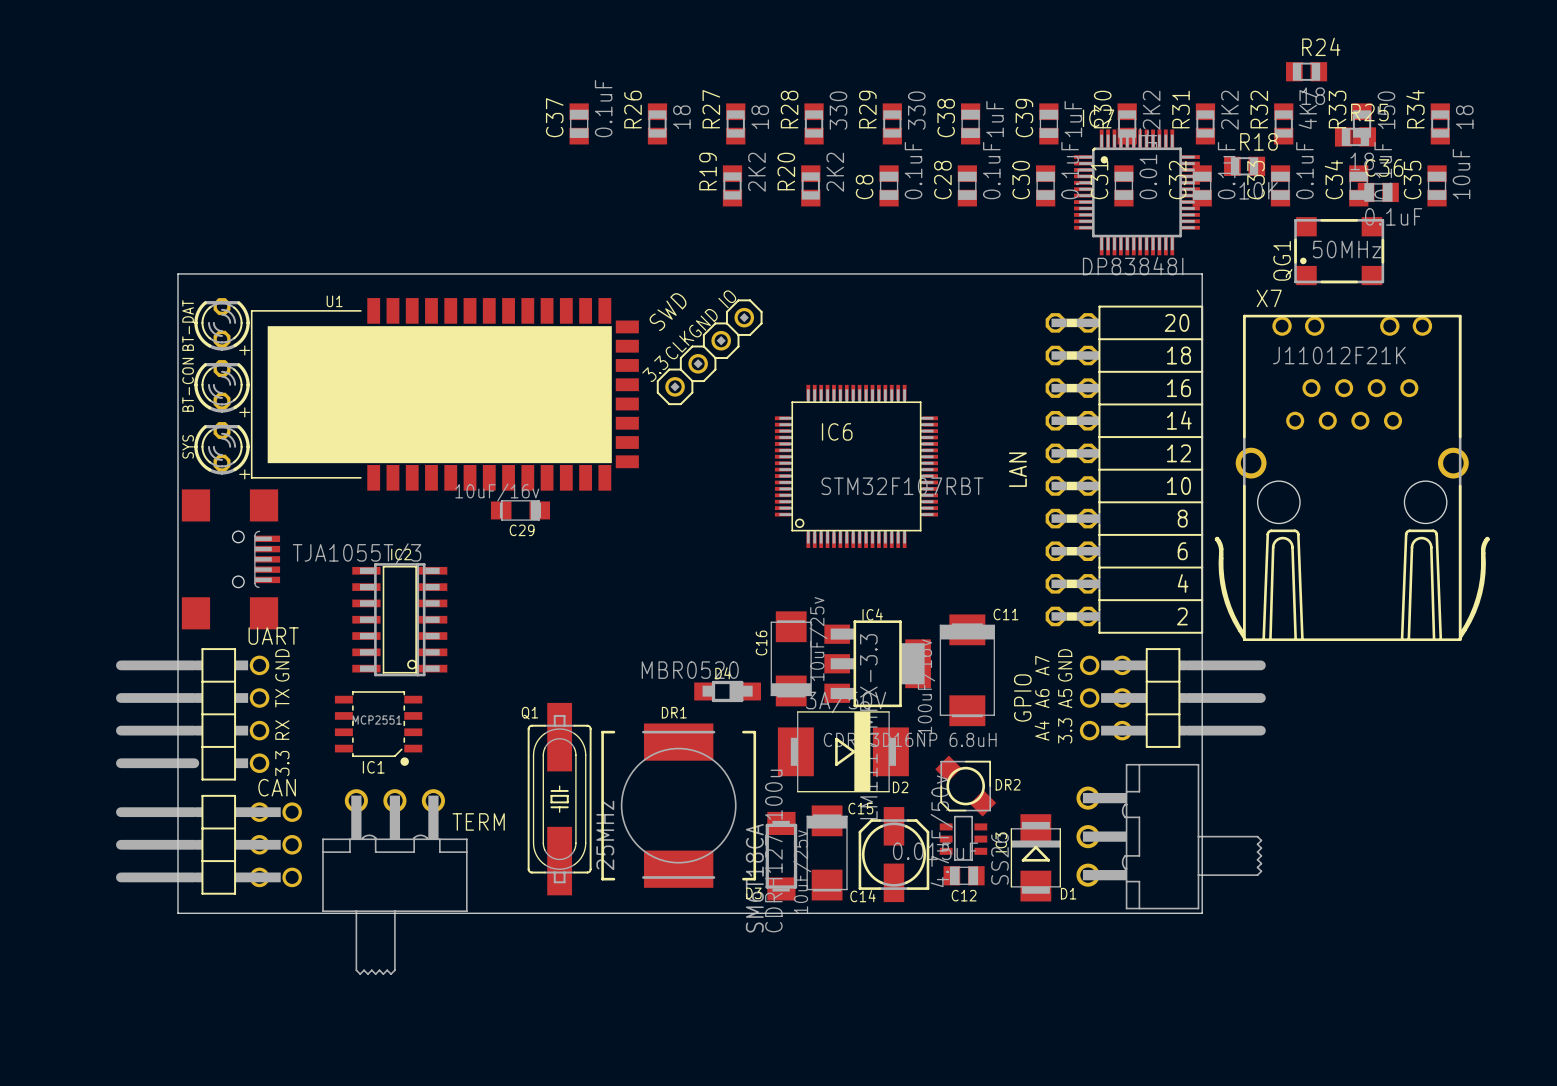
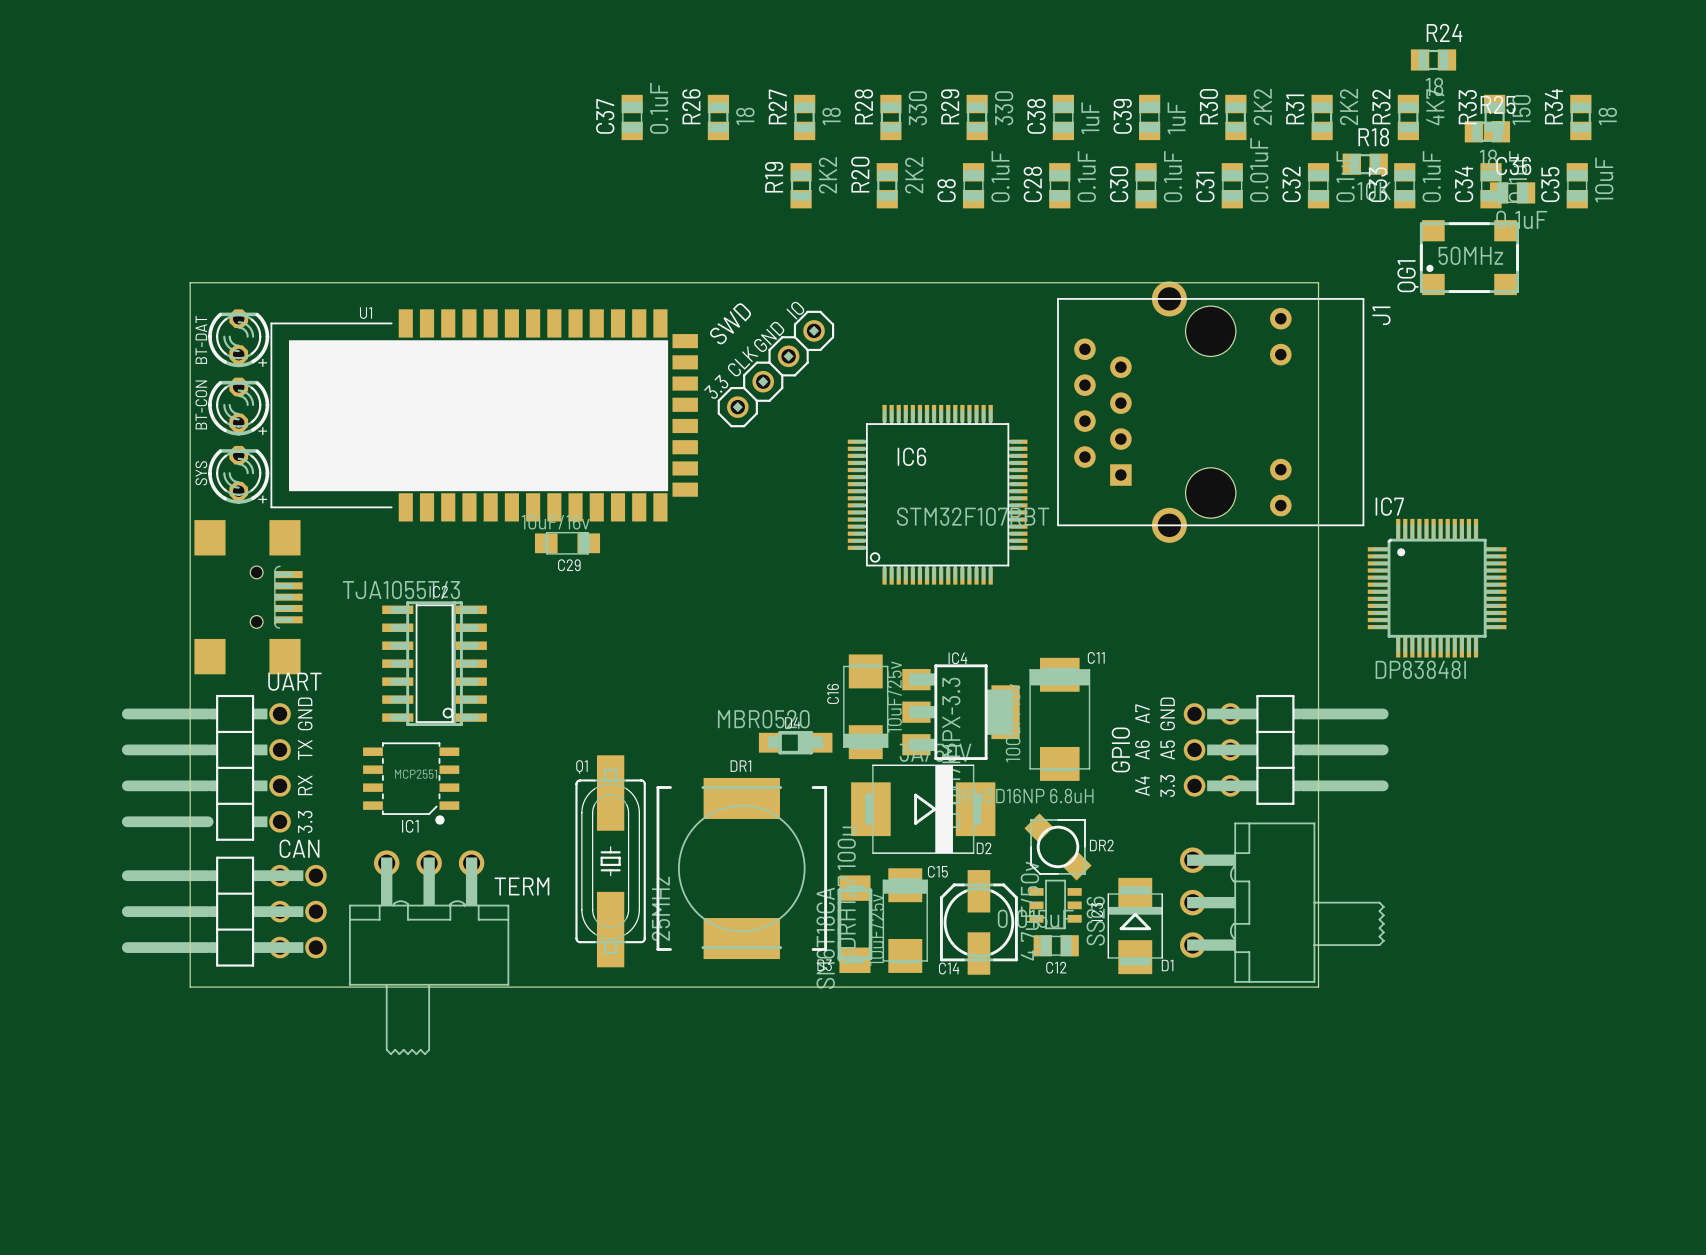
IC7 position: (1136, 192) -> (1437, 588)
J1: none -> (1210, 412)
part: LAN (1124, 469) -> none
X7: J11012F21K (1352, 477) -> none

